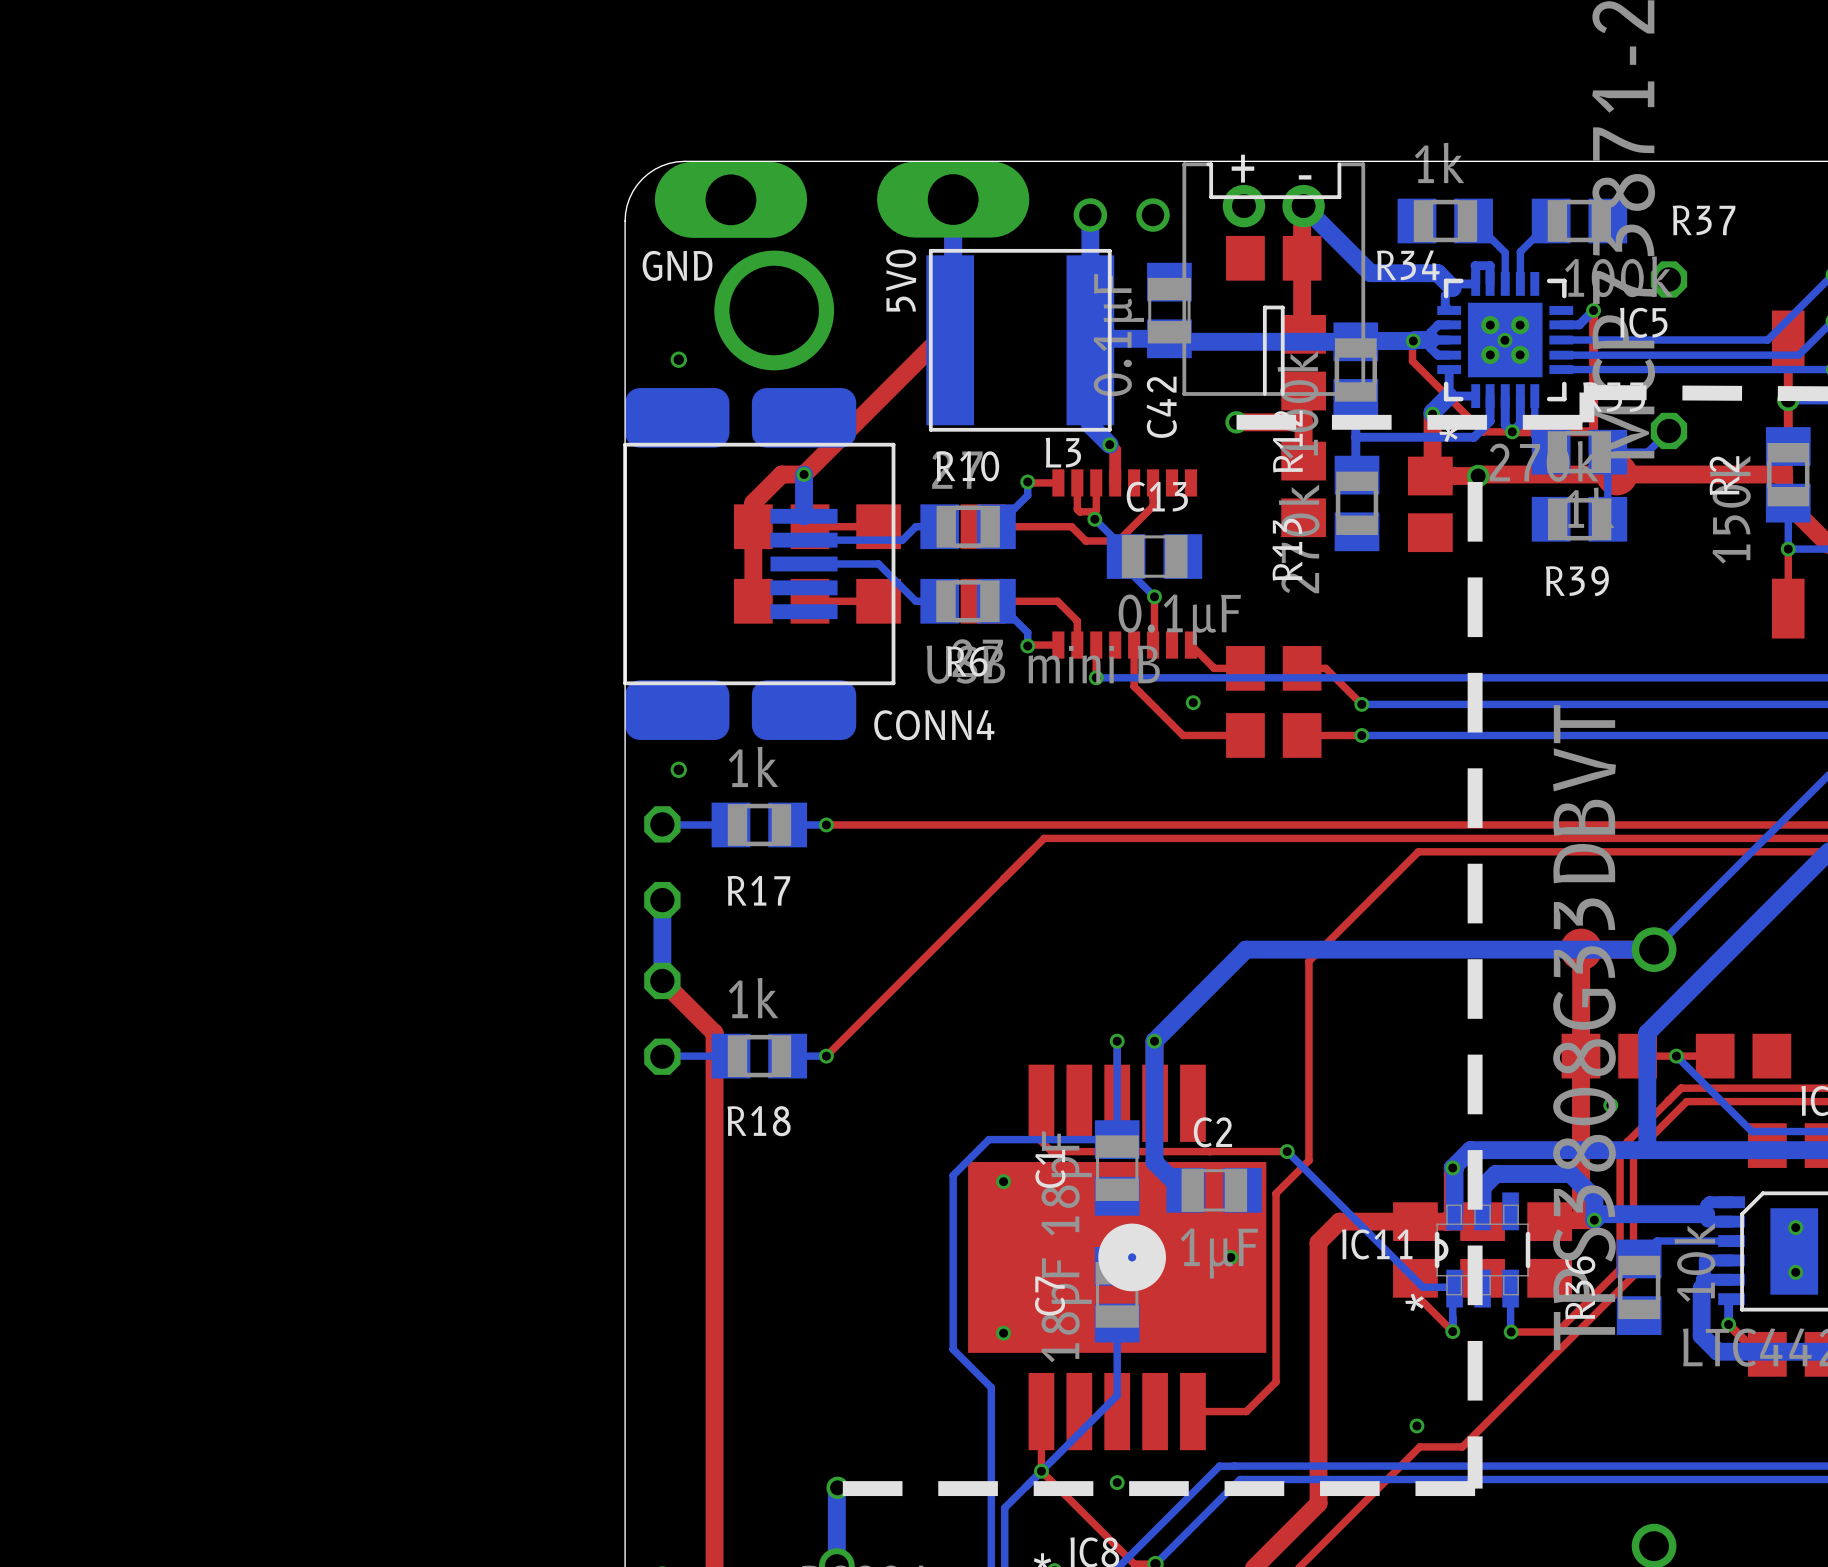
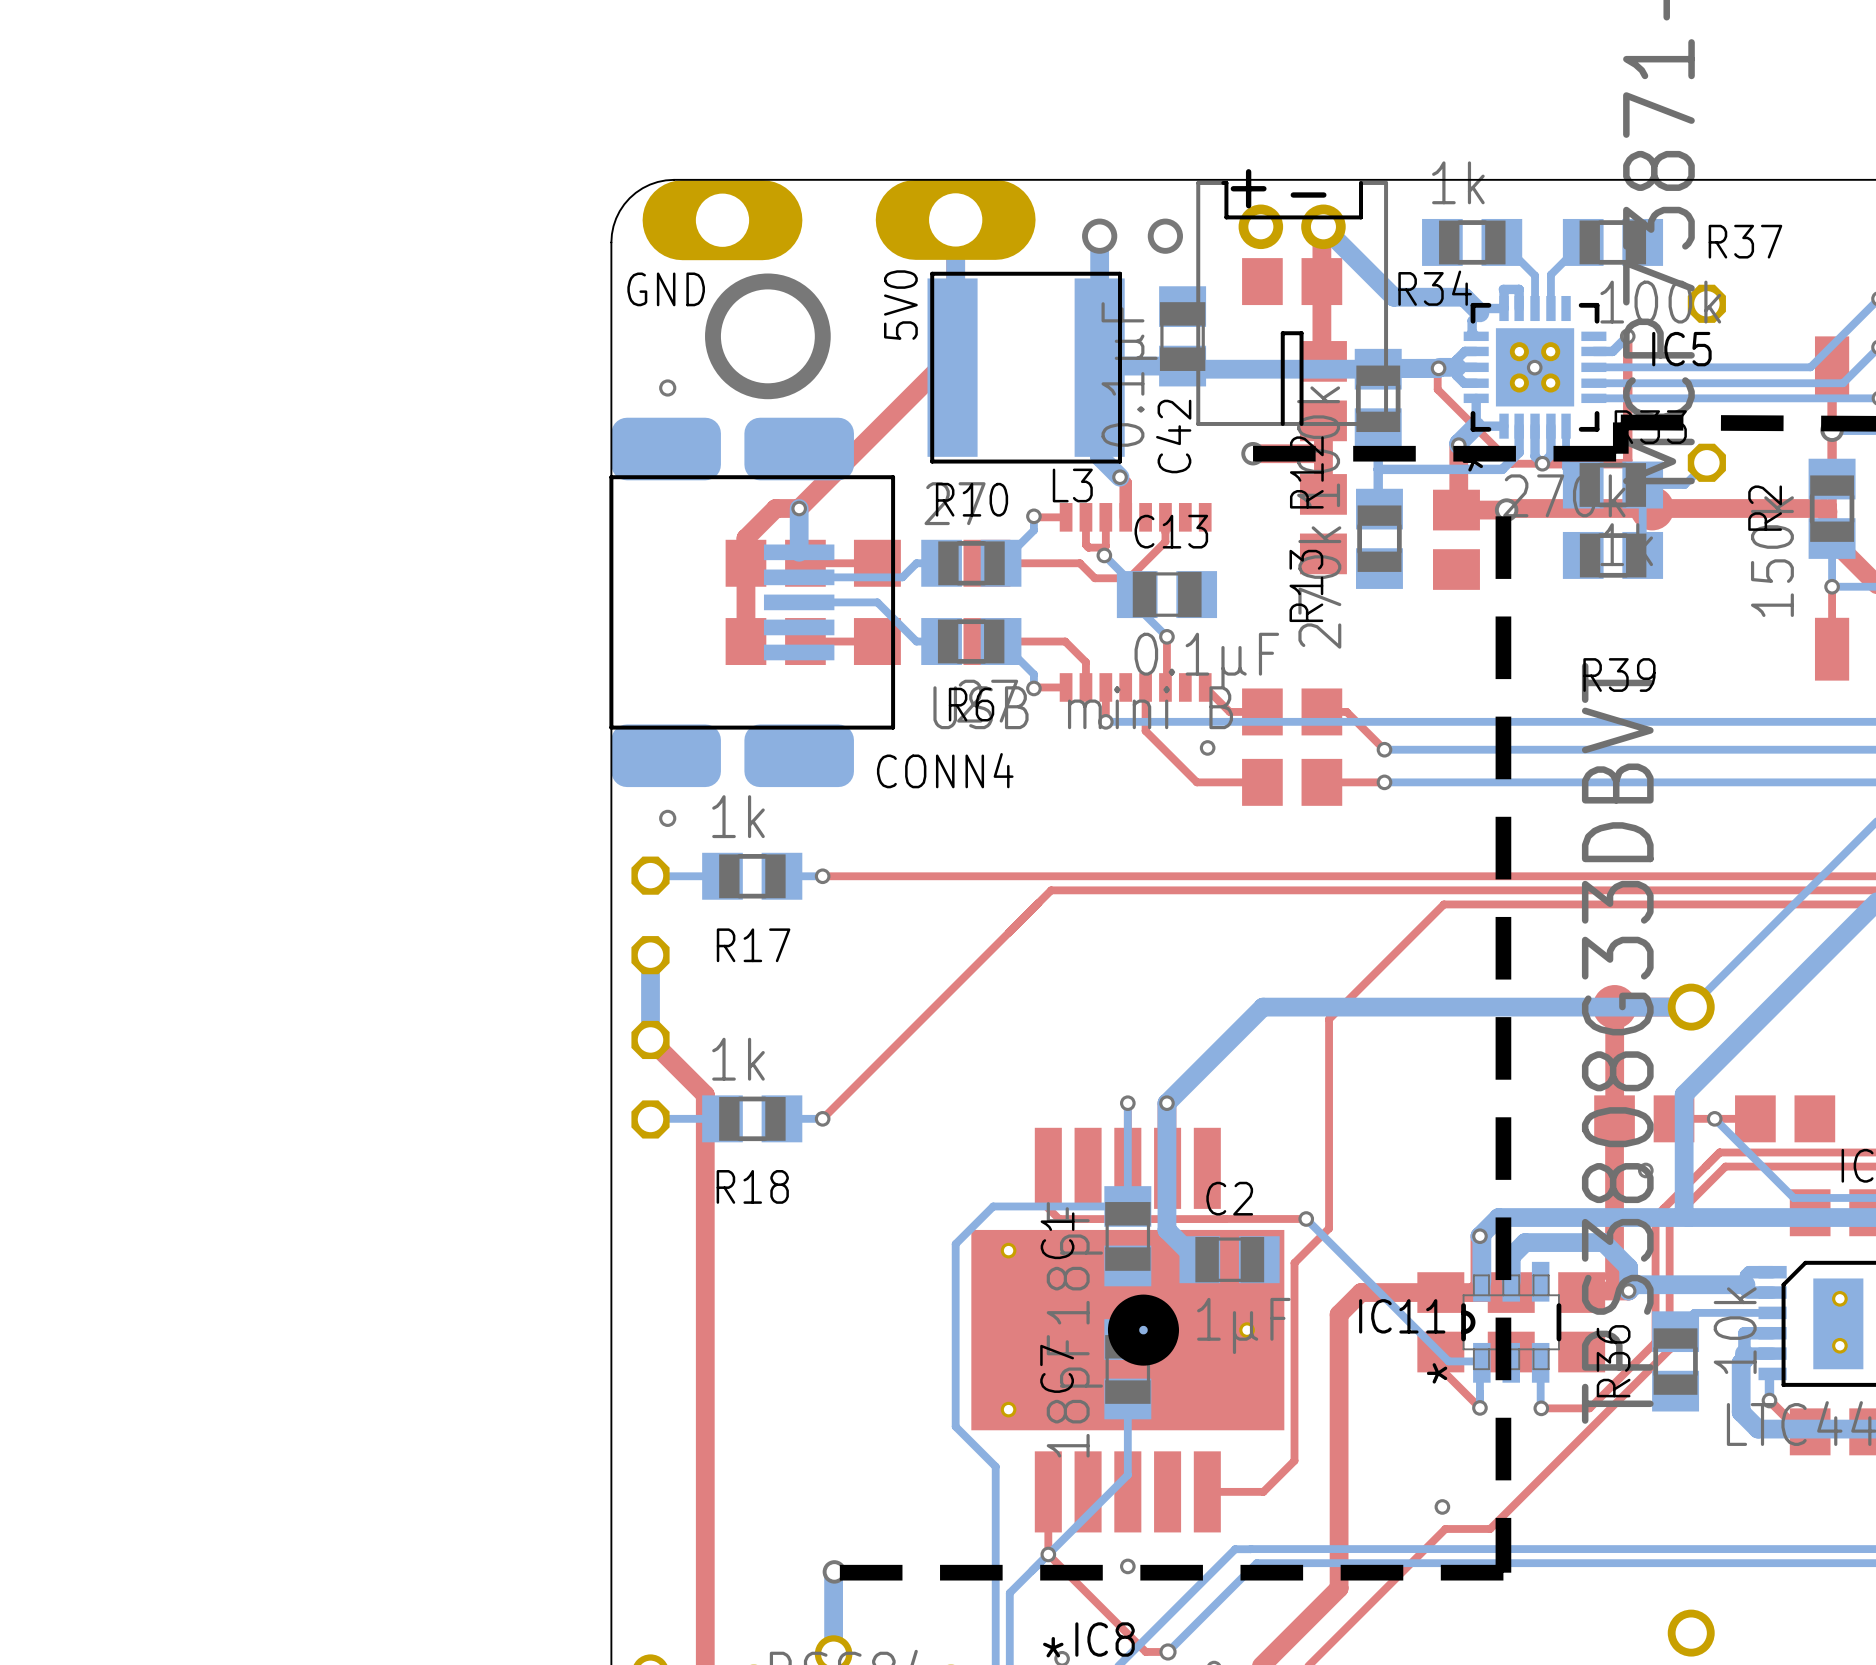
R39 name position: R39 (1577, 581) -> R39 (1619, 675)

